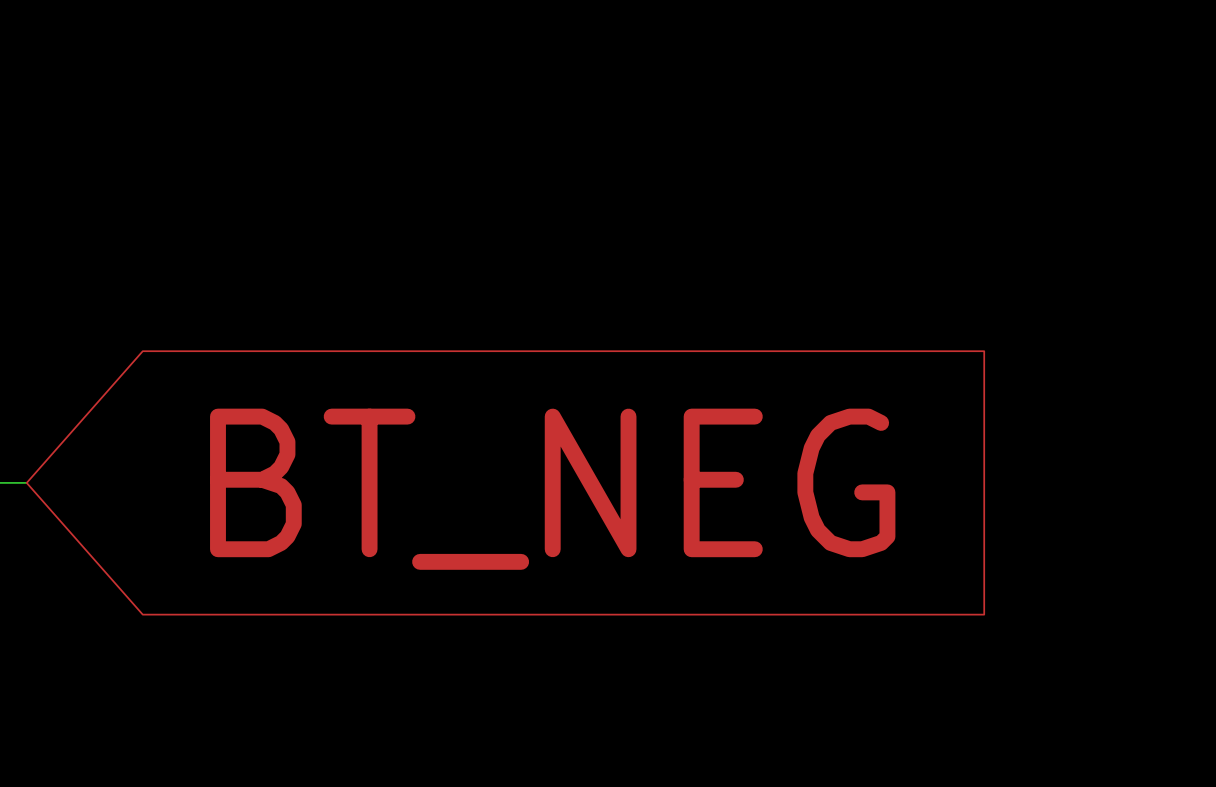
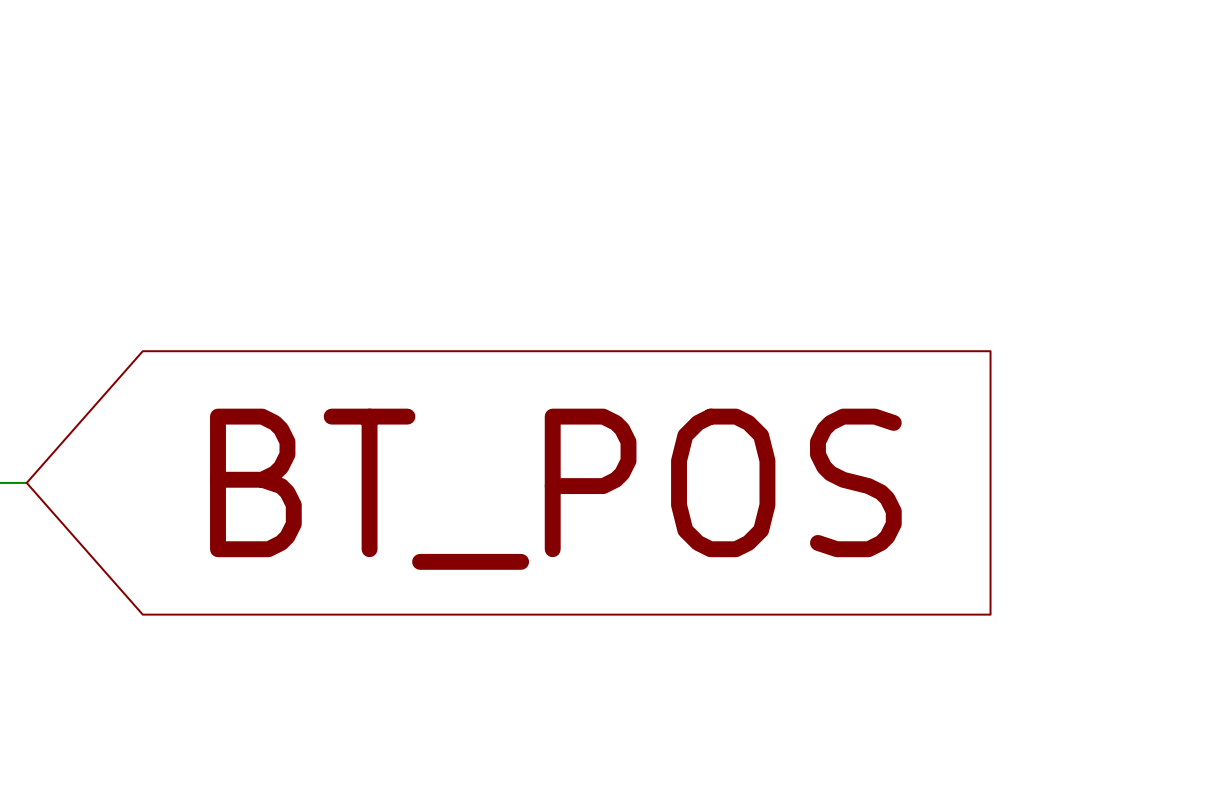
global label: BT_NEG (552, 489) -> BT_POS (555, 489)

